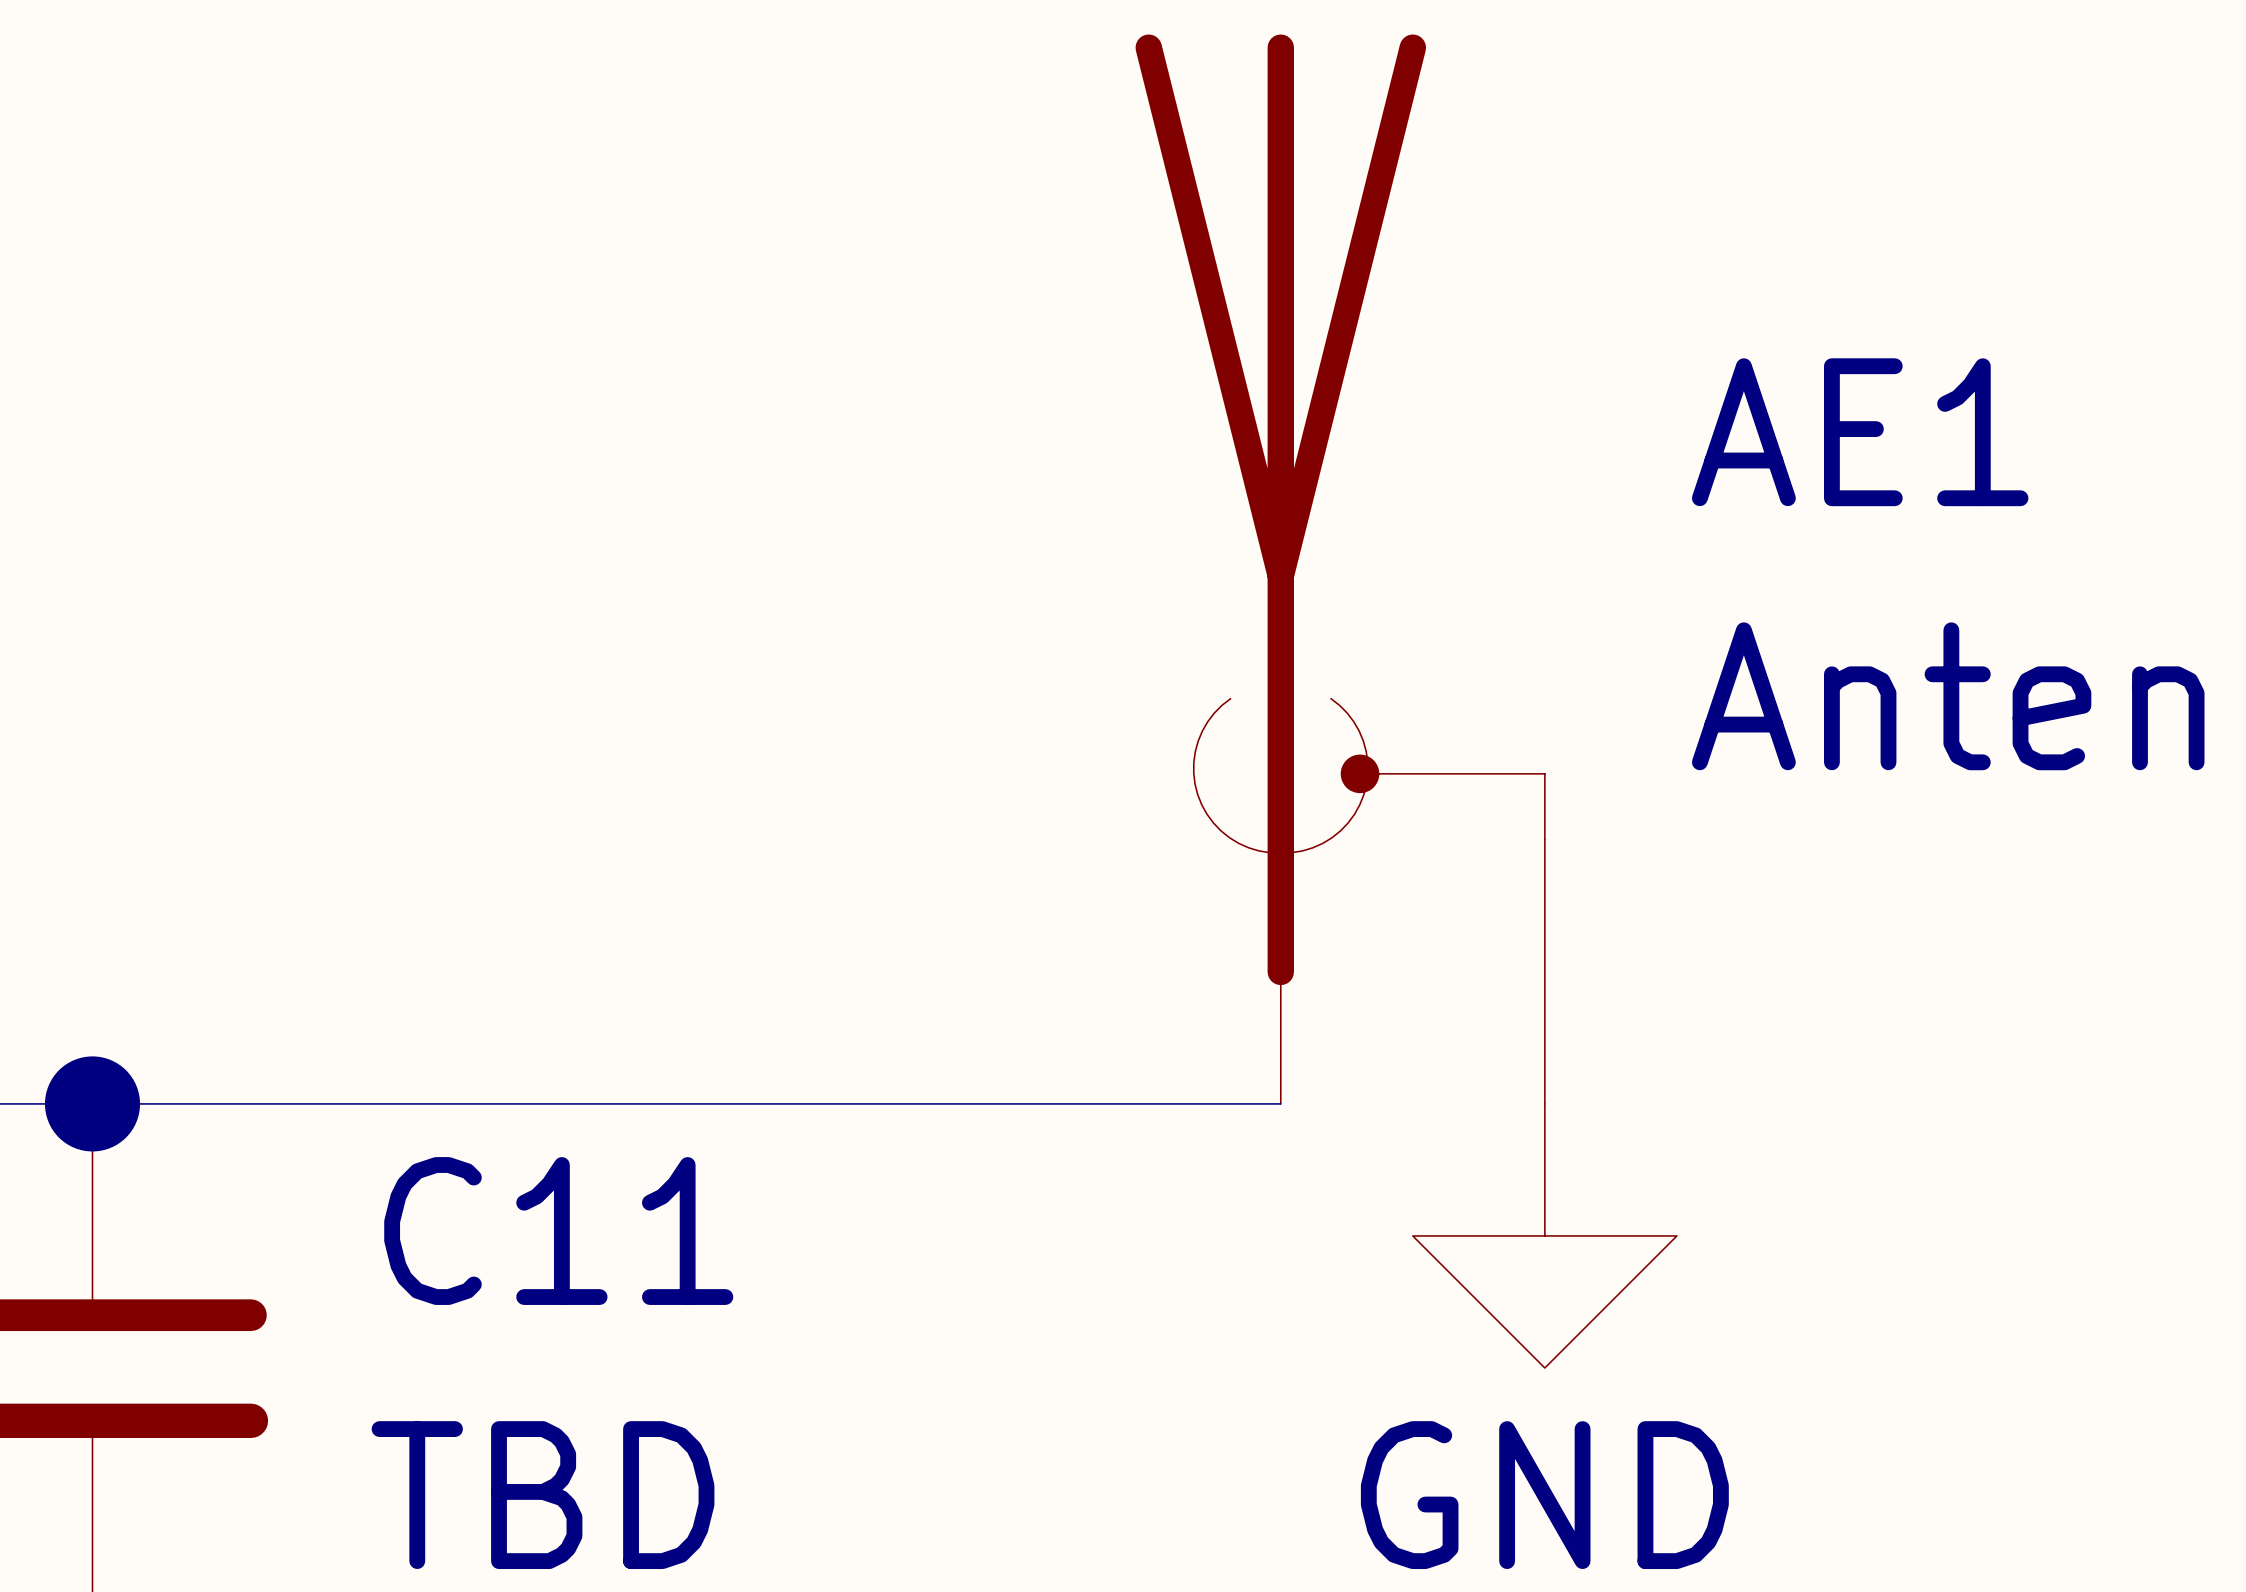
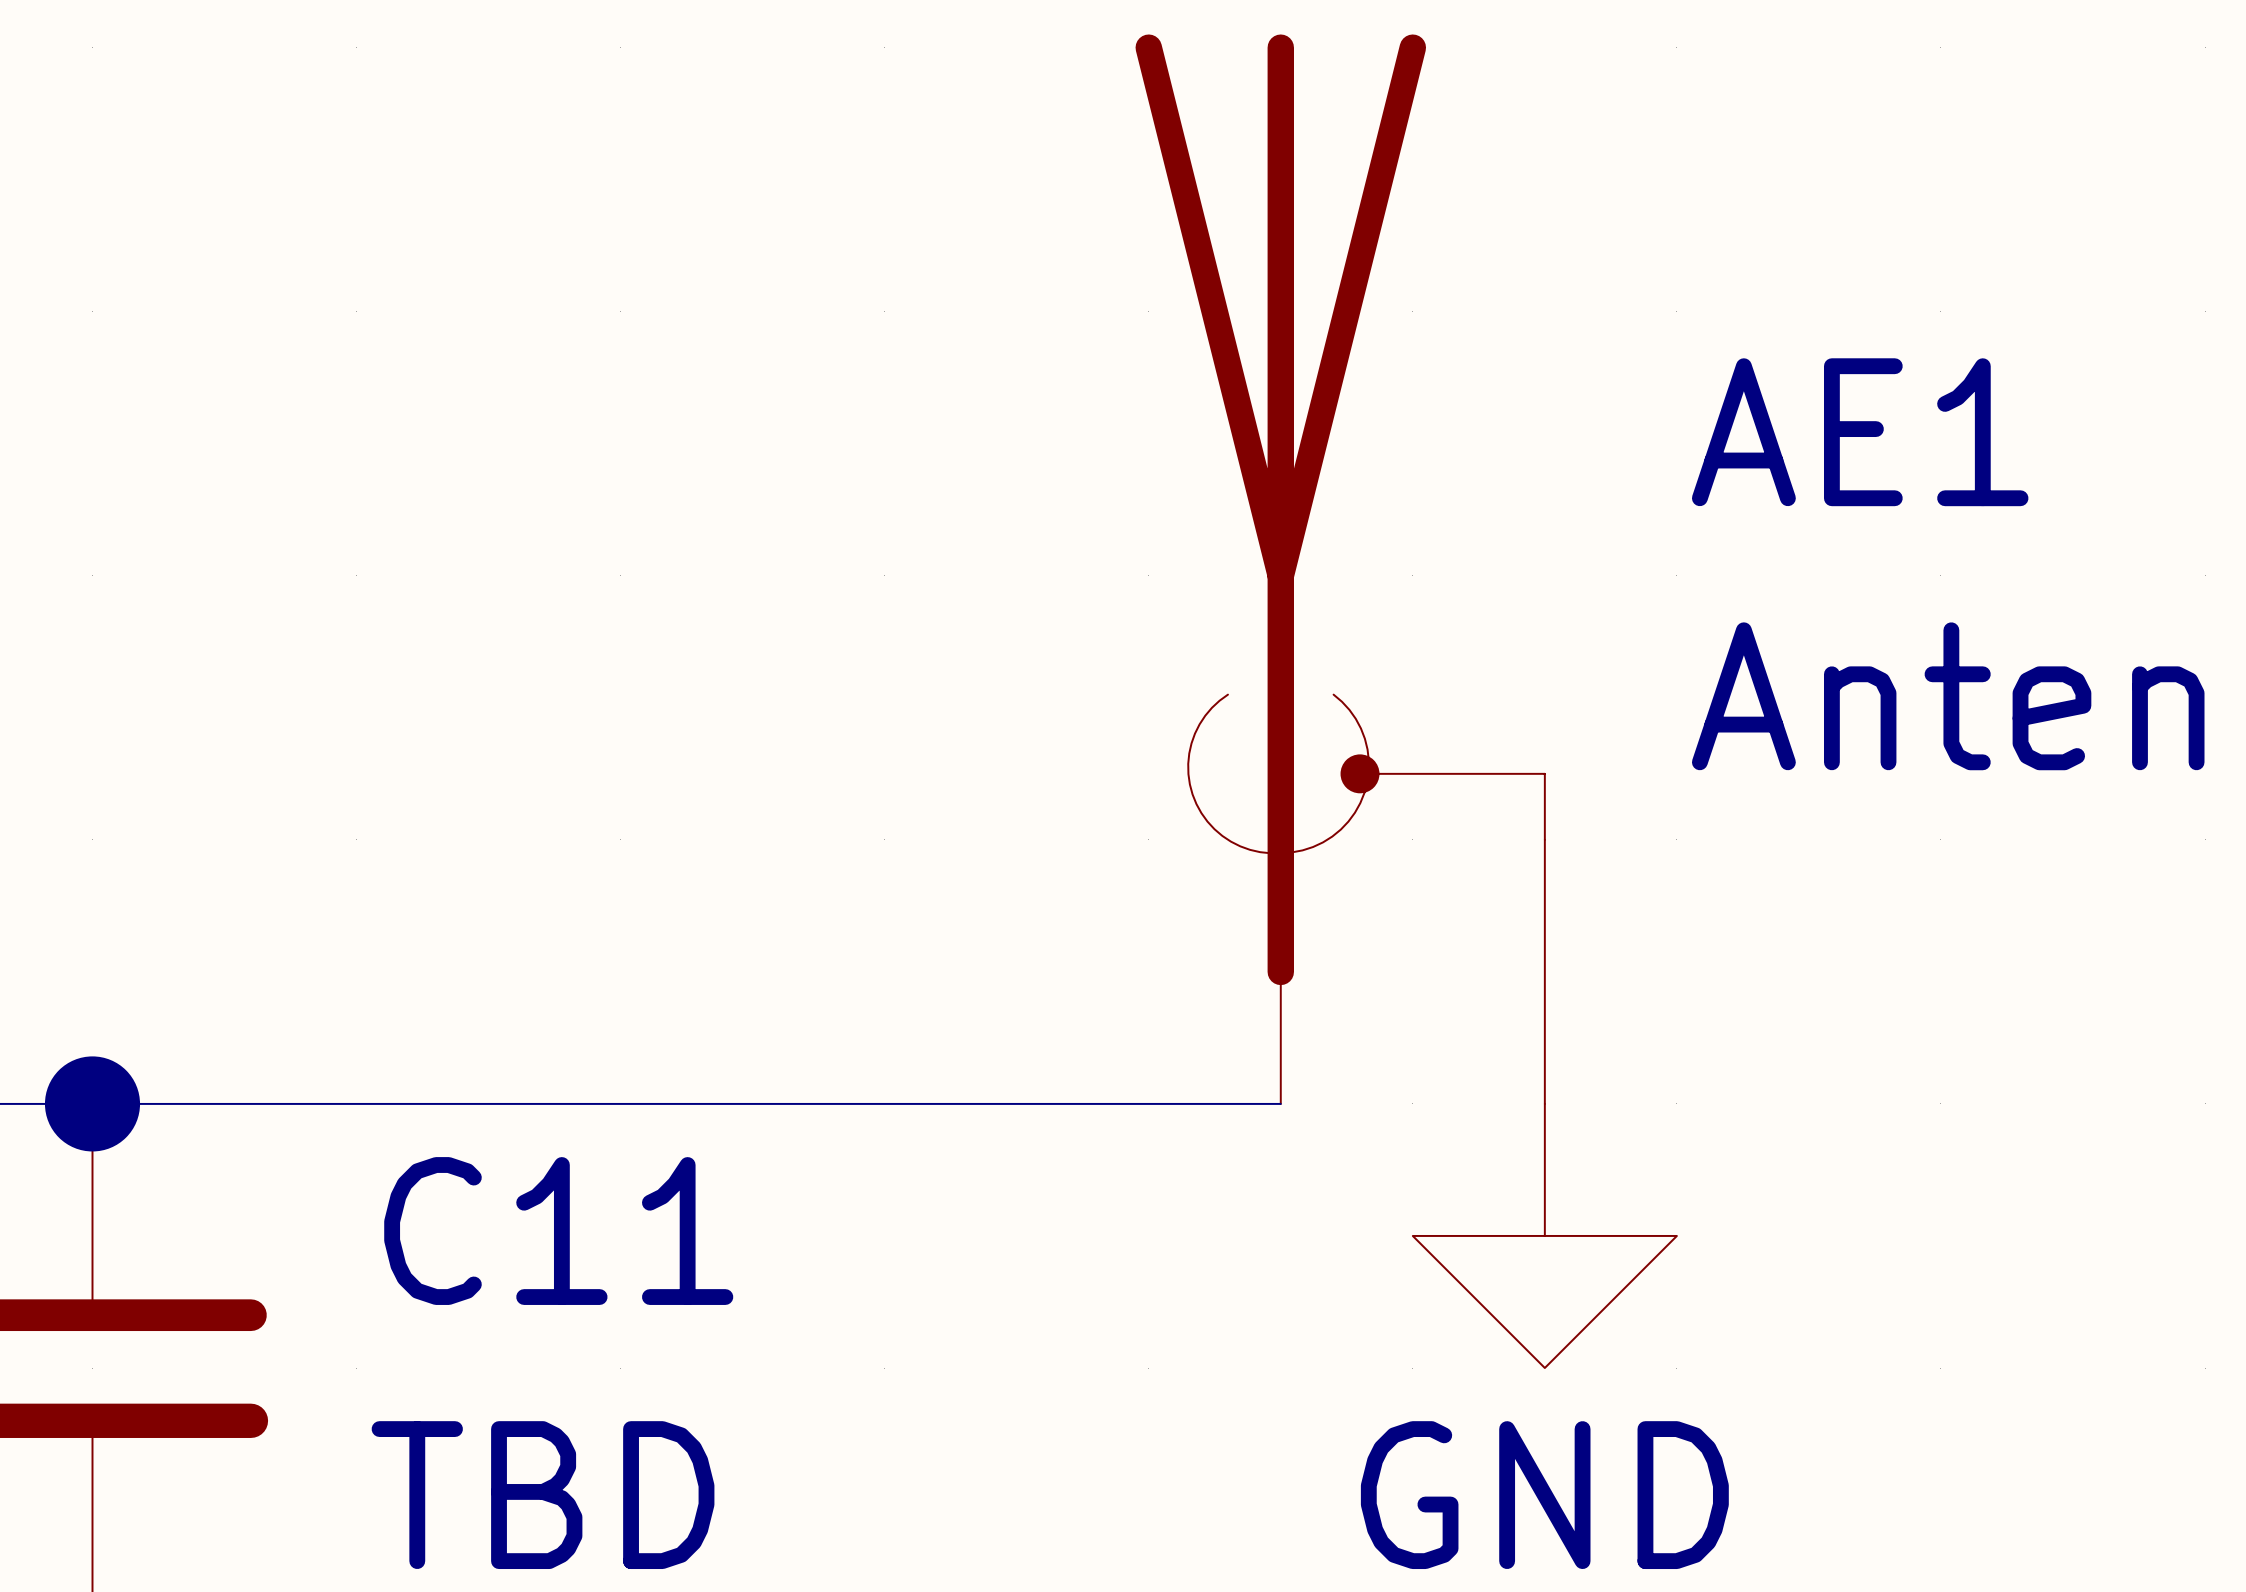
AE1 symbol: [1135, 34, 1545, 1104] -> [1135, 34, 1545, 1104]

